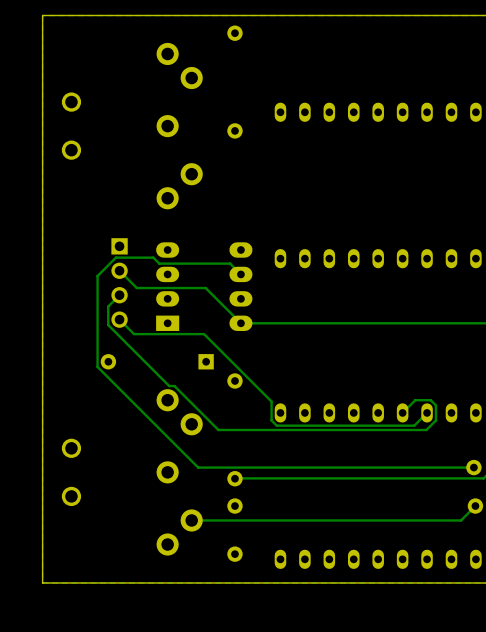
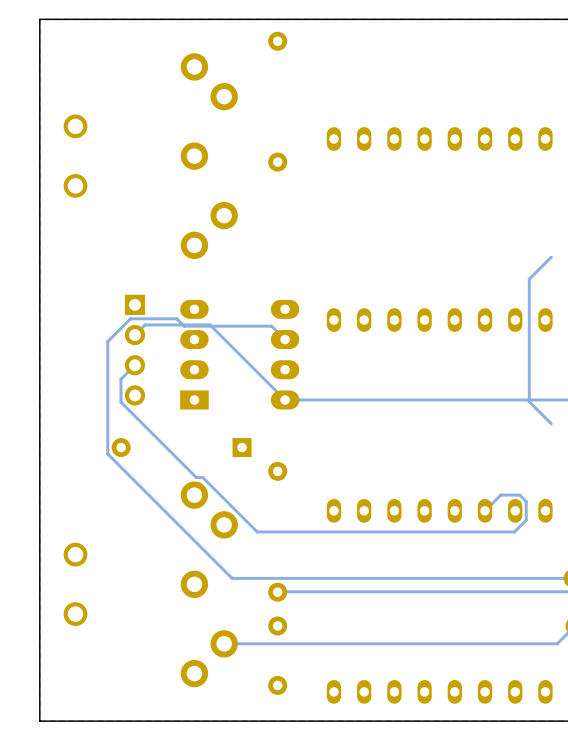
track: none -> (551, 257) (529, 279) (529, 401) (551, 423)
track: (119, 270) (136, 288) (205, 288) -> (134, 335) (145, 324) (210, 324) (241, 356)
track: (119, 319) (134, 334) (204, 334) (271, 401) (271, 420) (276, 425) (414, 425) (427, 412) -> none

